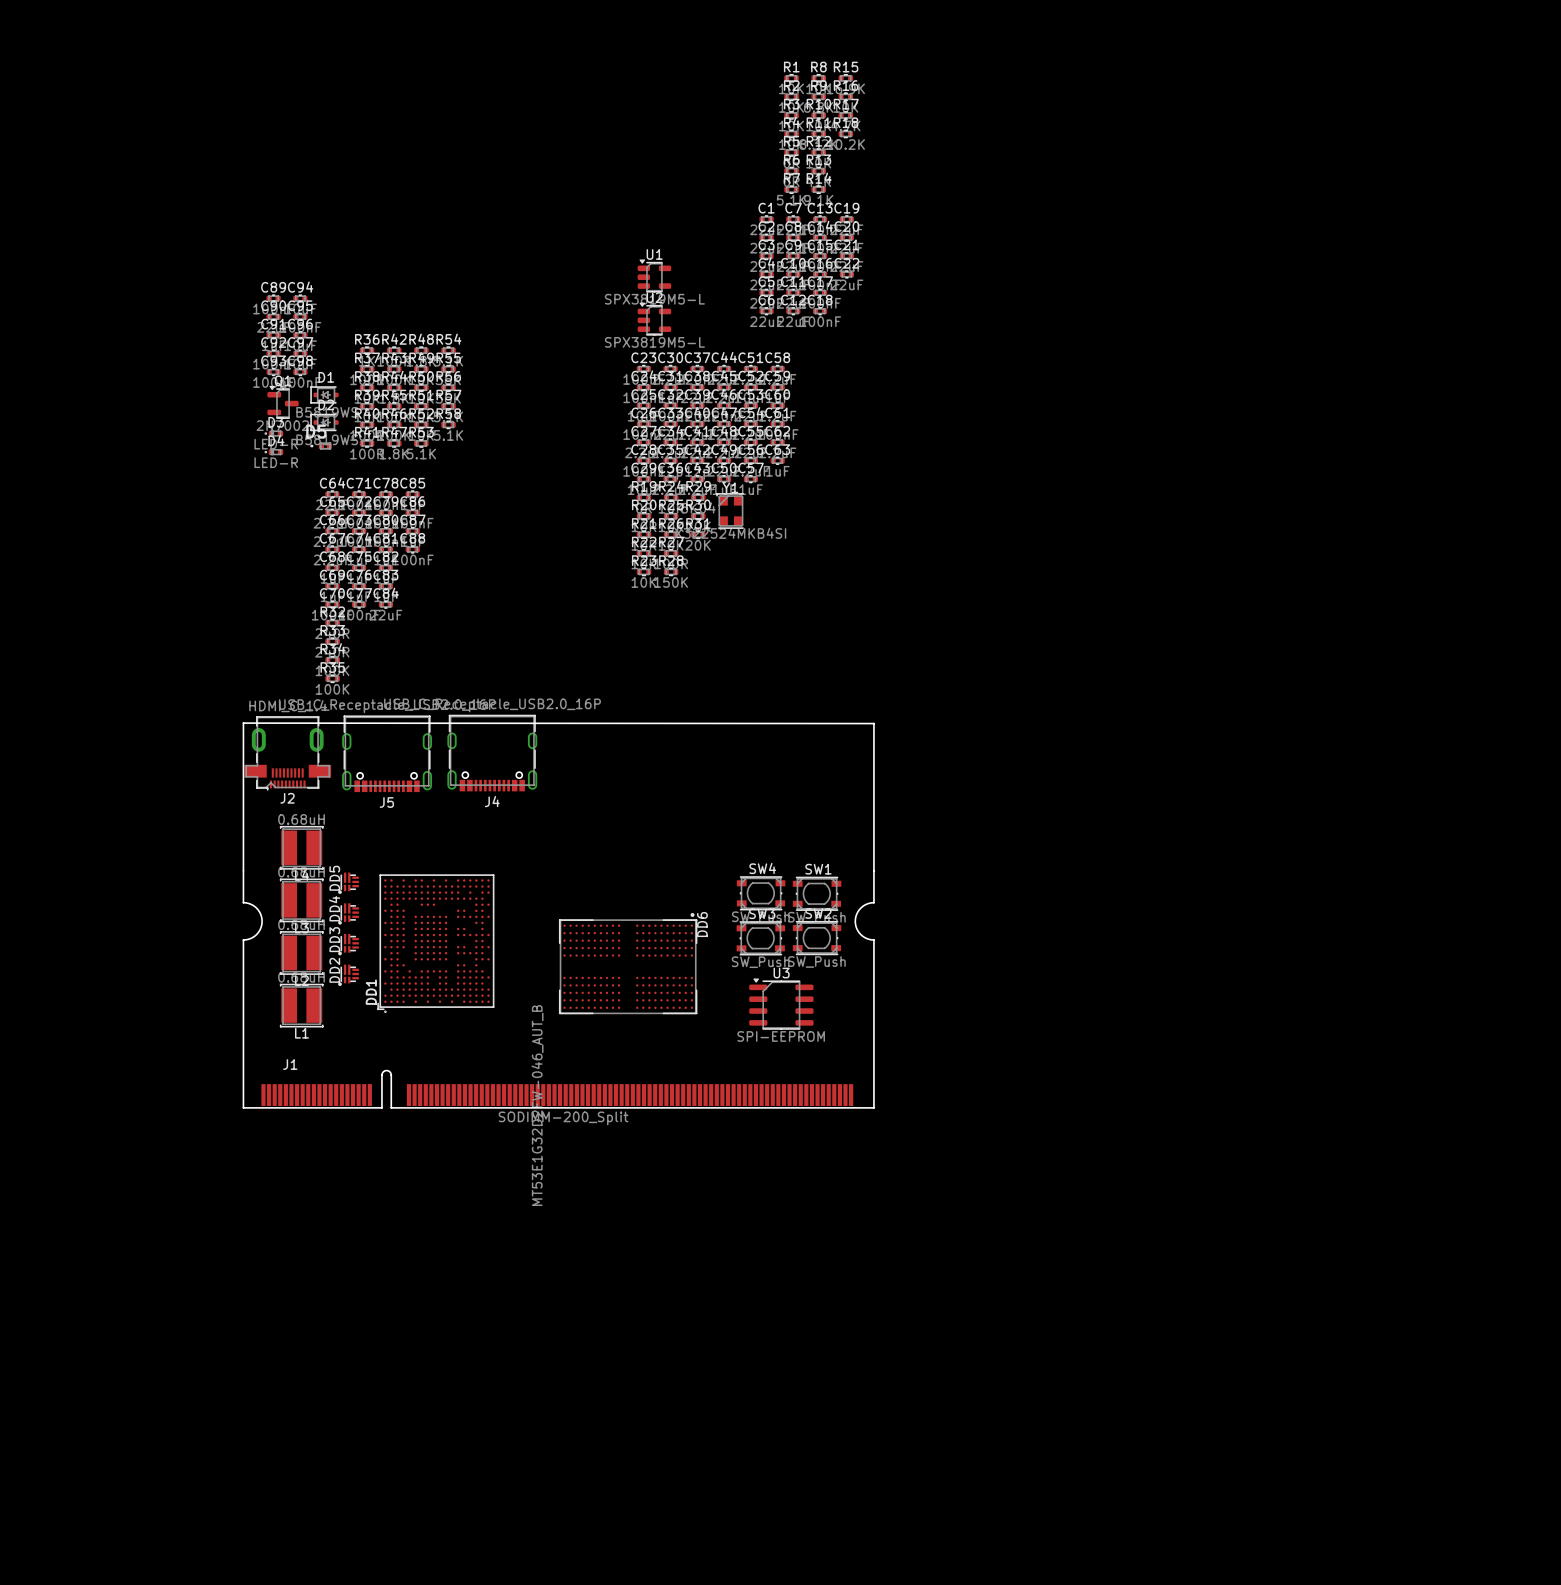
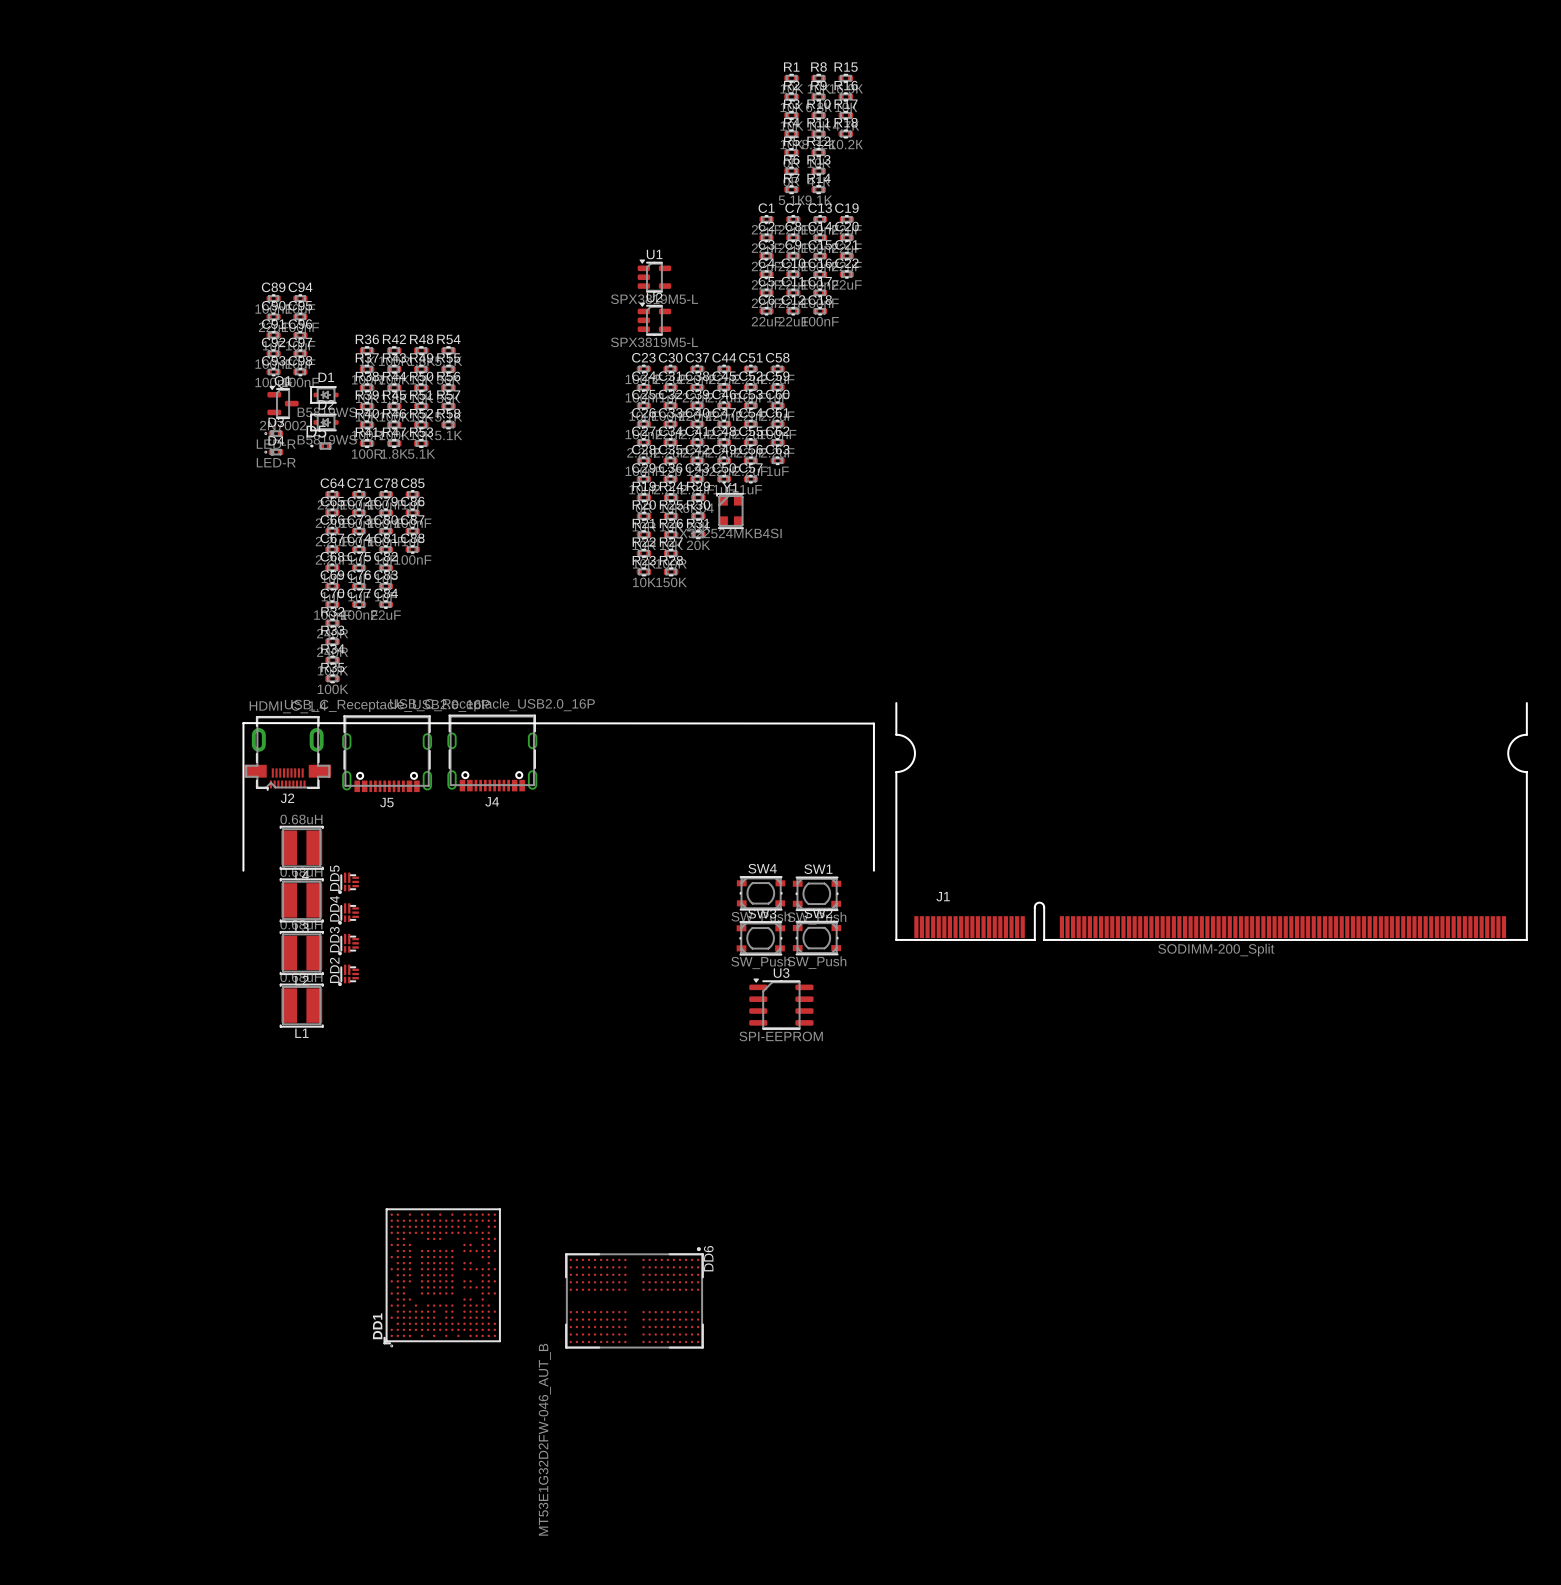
DD1 position: (435, 943) -> (442, 1277)
DD6 position: (628, 963) -> (634, 1297)
J1 position: (558, 989) -> (1211, 821)

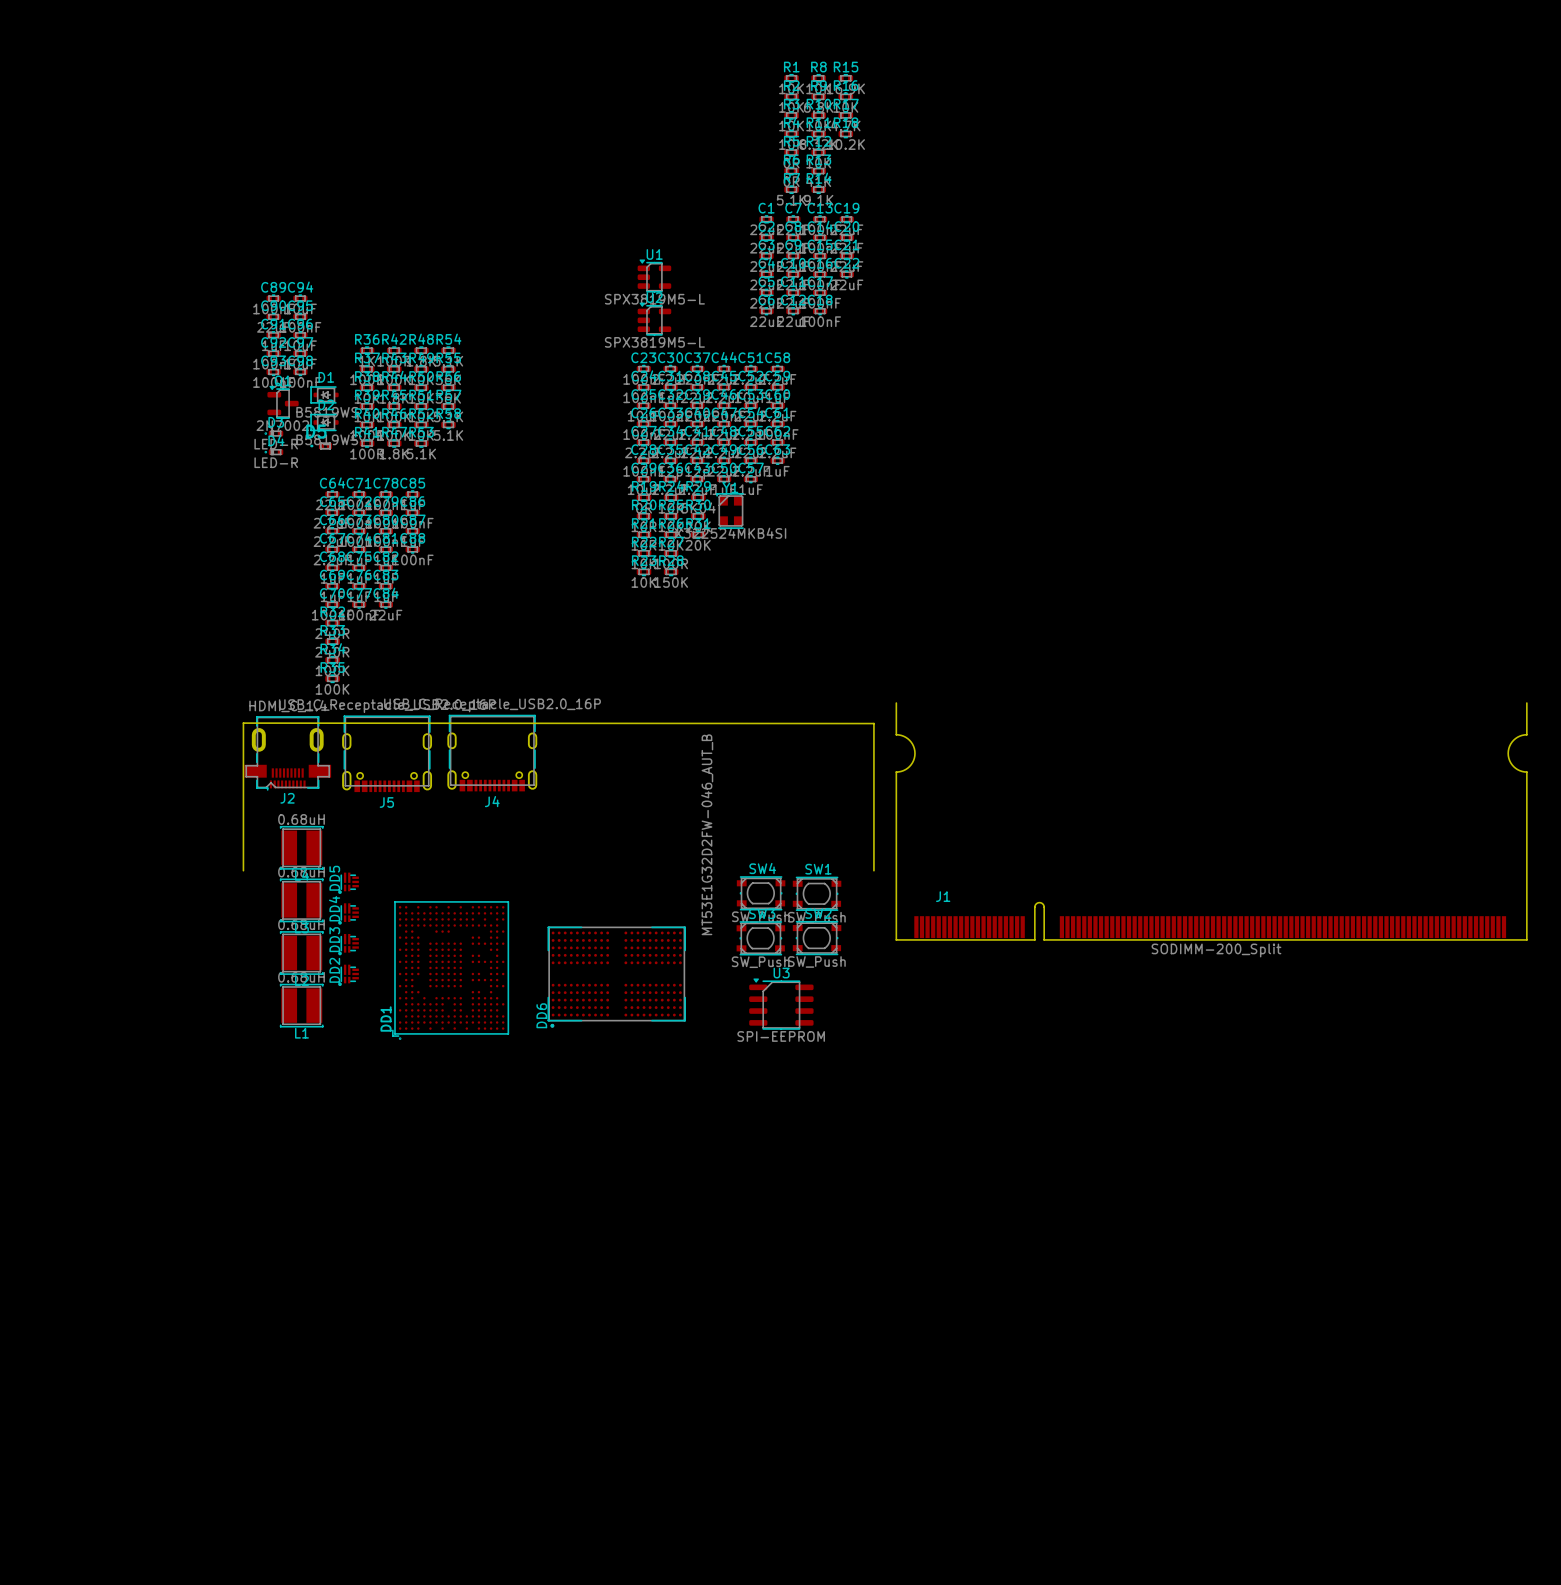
DD6 footprint: [565, 1247, 704, 1349] -> [547, 926, 686, 1028]
DD6 name position: DD6 (708, 1258) -> DD6 (541, 1015)
DD1 position: (442, 1277) -> (450, 970)
DD6 value position: MT53E1G32D2FW-046_AUT_B (544, 1439) -> MT53E1G32D2FW-046_AUT_B (707, 834)

